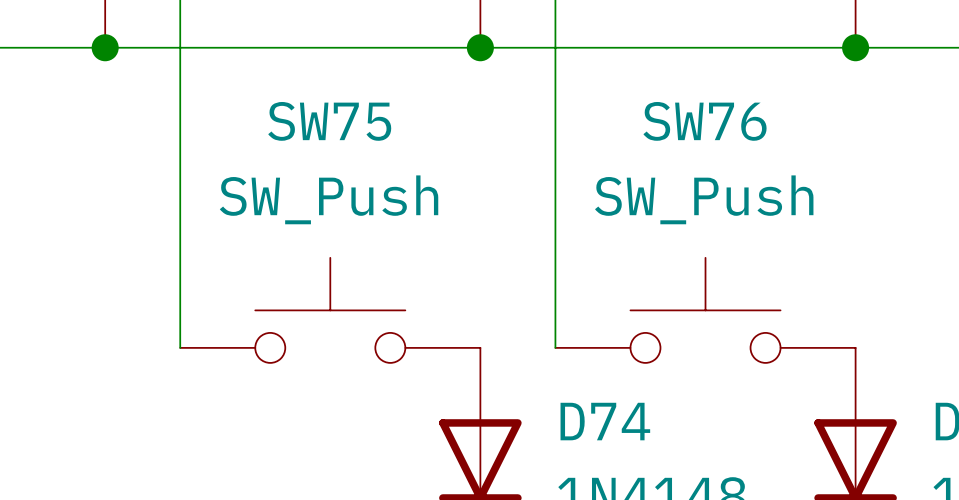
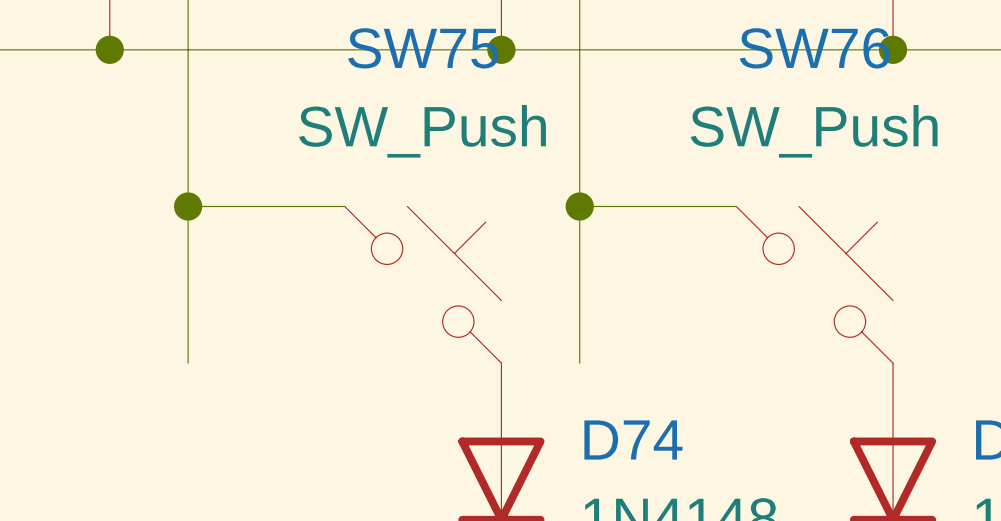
wire: none -> (188, 206) (344, 206)
junction: none -> (188, 206)
wire: none -> (579, 206) (736, 206)
junction: none -> (579, 206)
SW75 symbol: [180, 257, 481, 363] -> [344, 206, 502, 364]
SW76 symbol: [555, 257, 856, 363] -> [736, 206, 894, 364]

